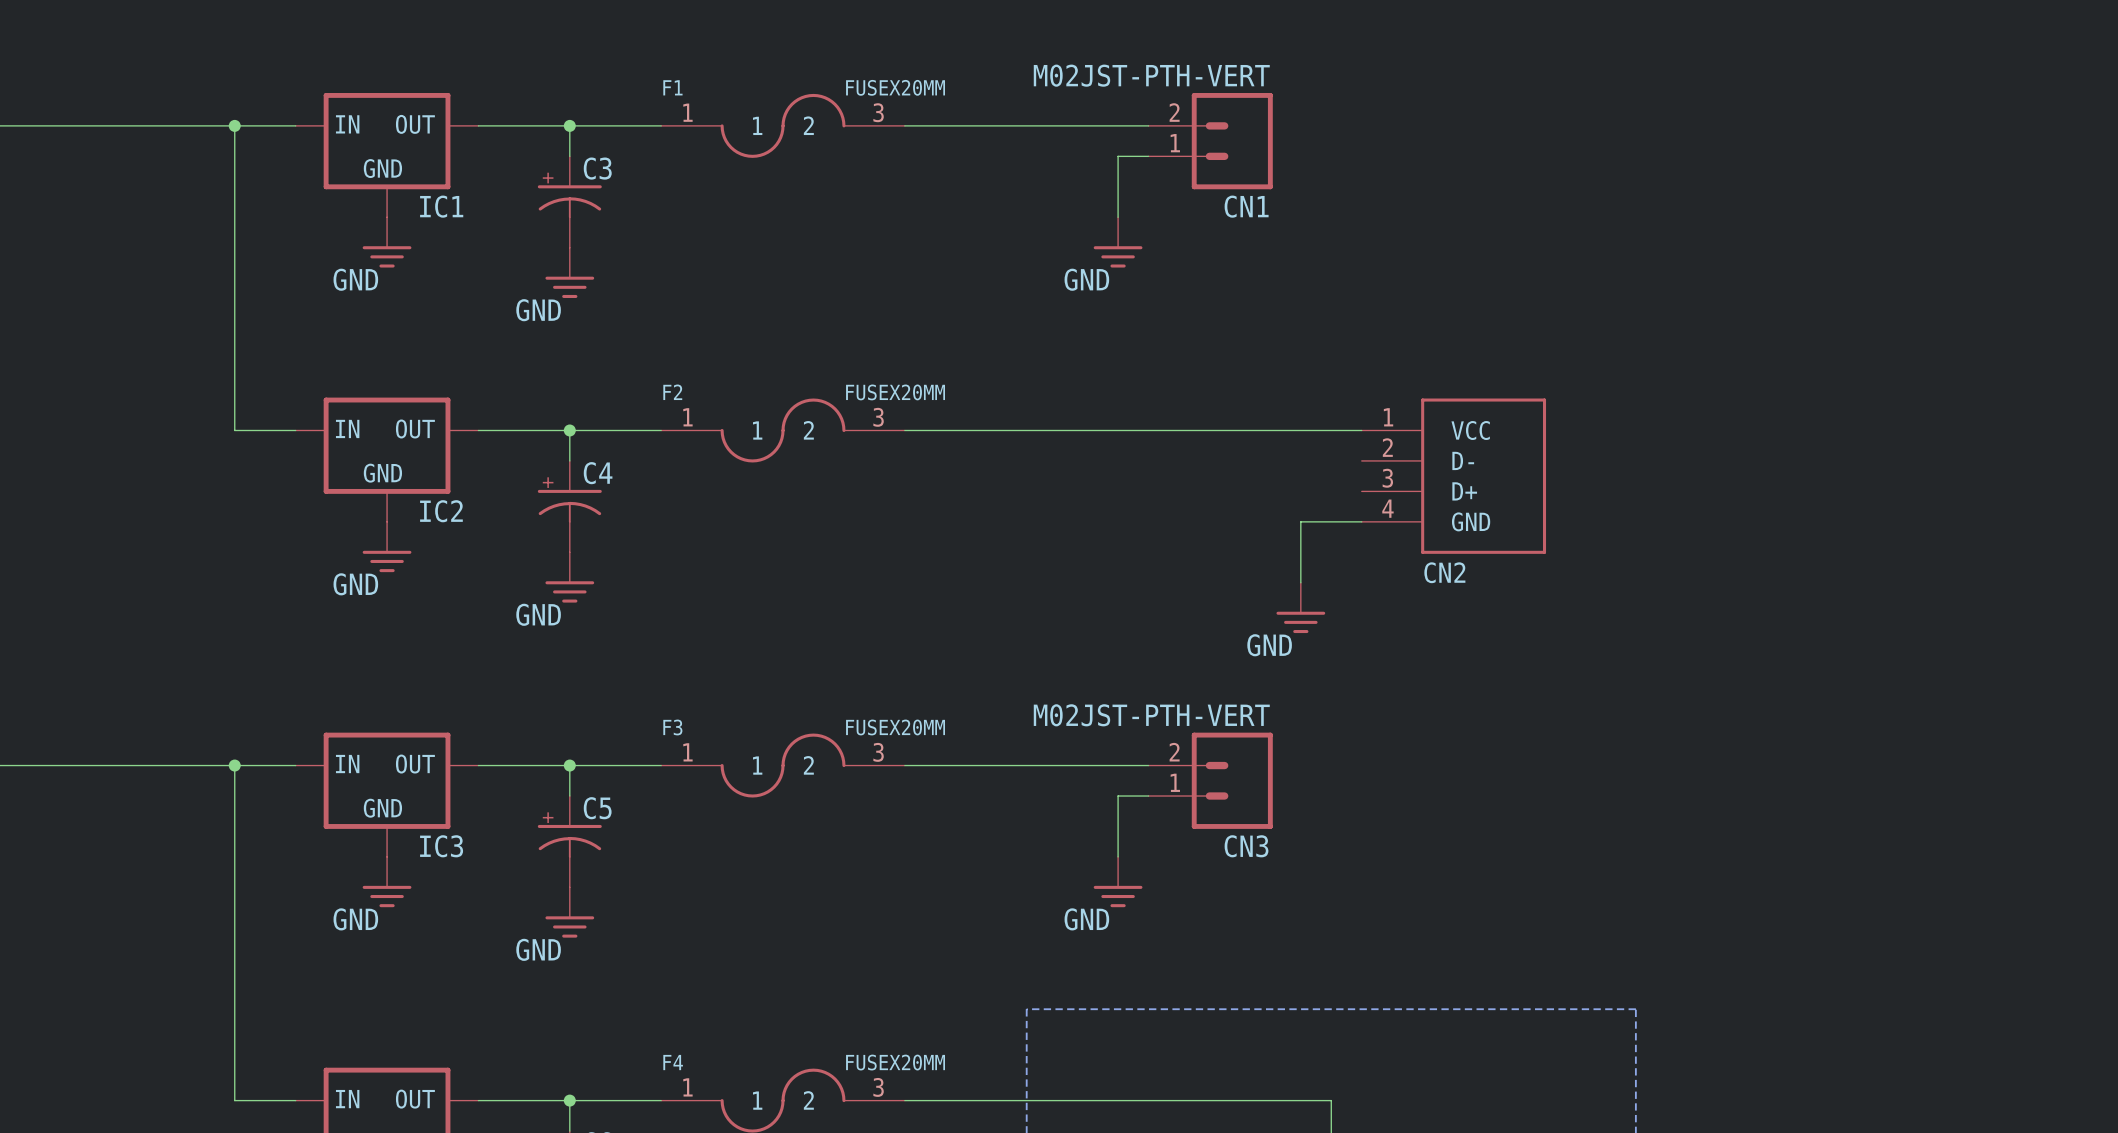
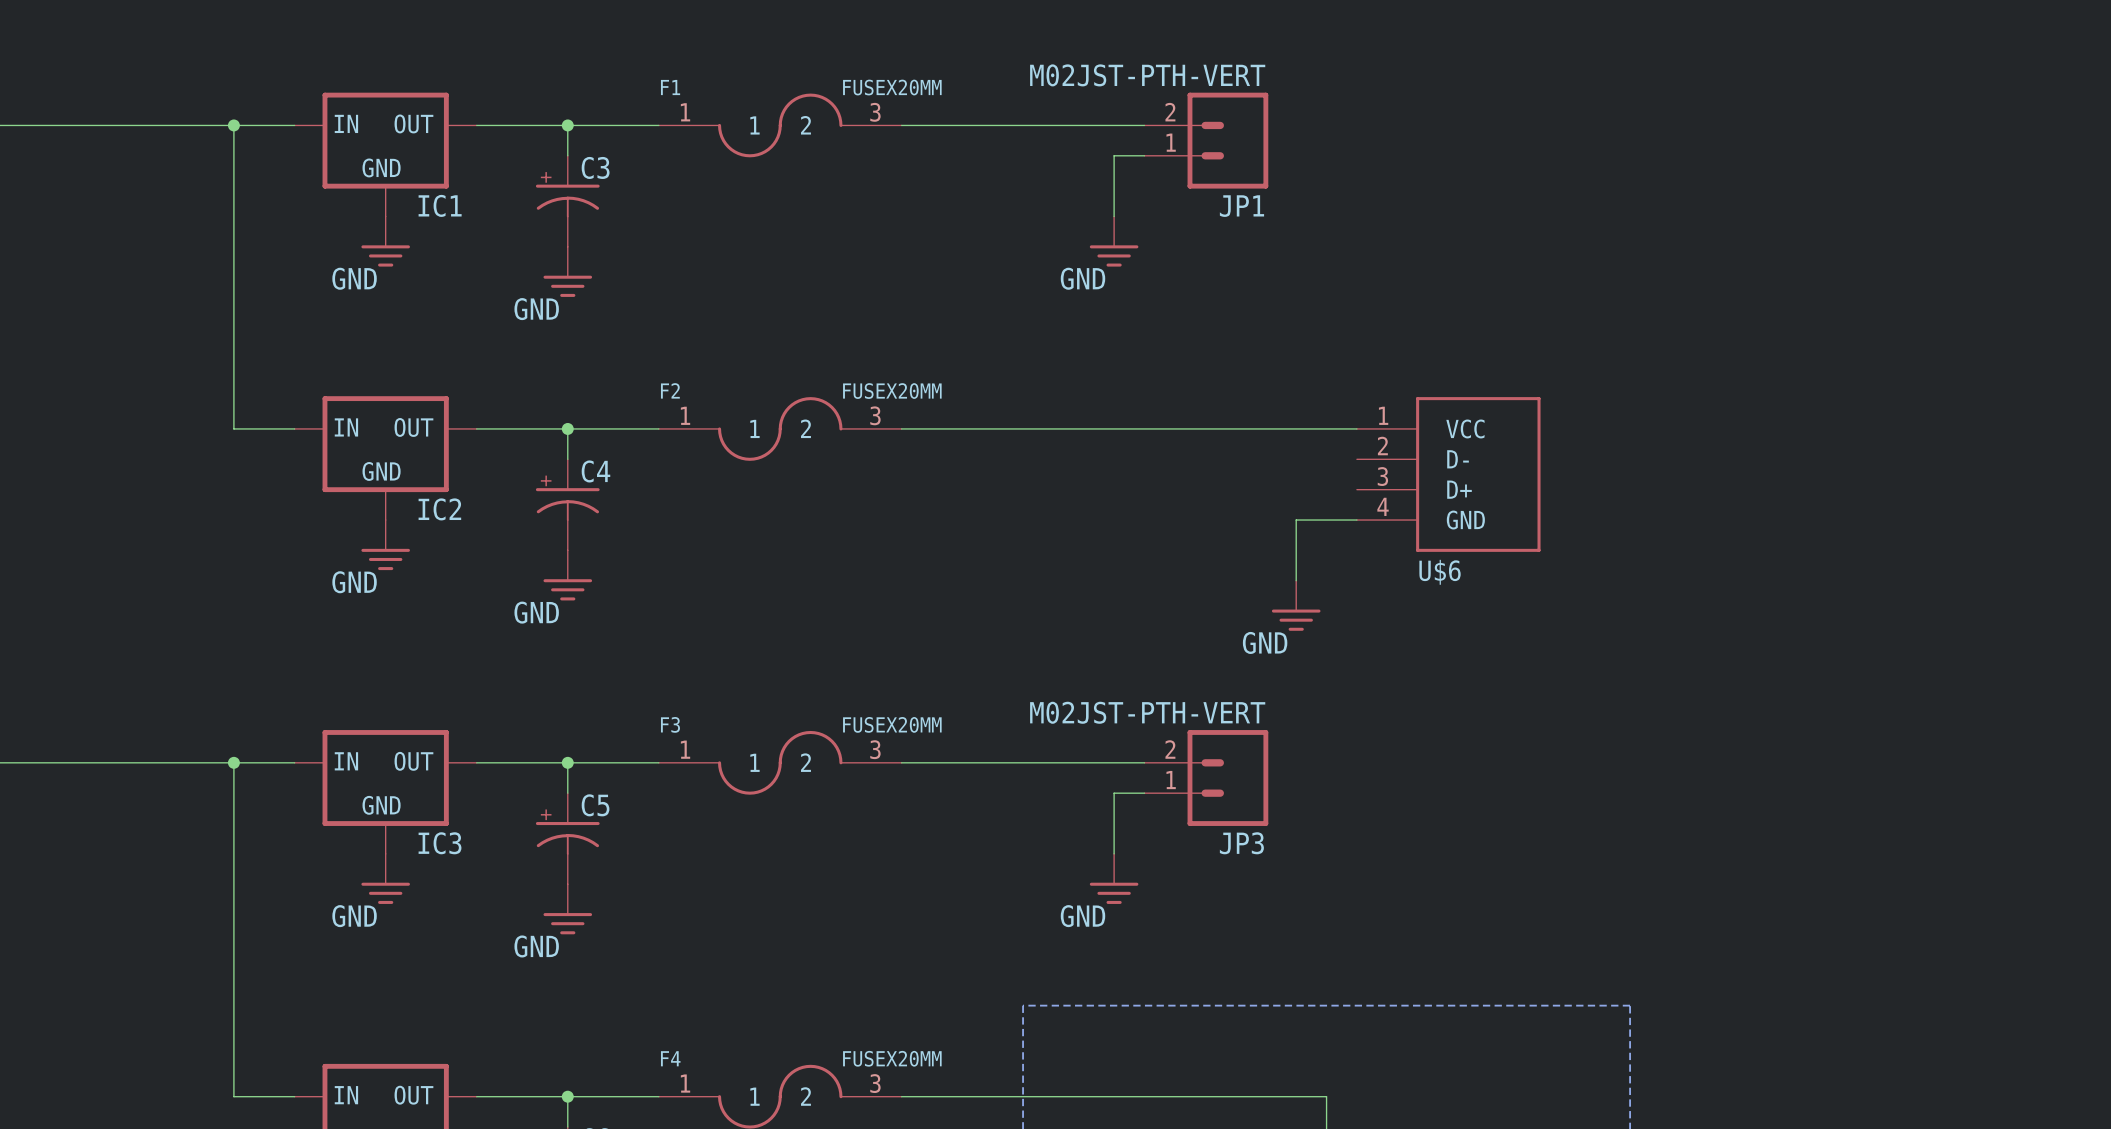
CN1 name: CN1 (1246, 206) -> JP1 (1241, 206)
CN2 name: CN2 (1444, 572) -> U$6 (1440, 572)
CN3 name: CN3 (1246, 846) -> JP3 (1241, 843)

